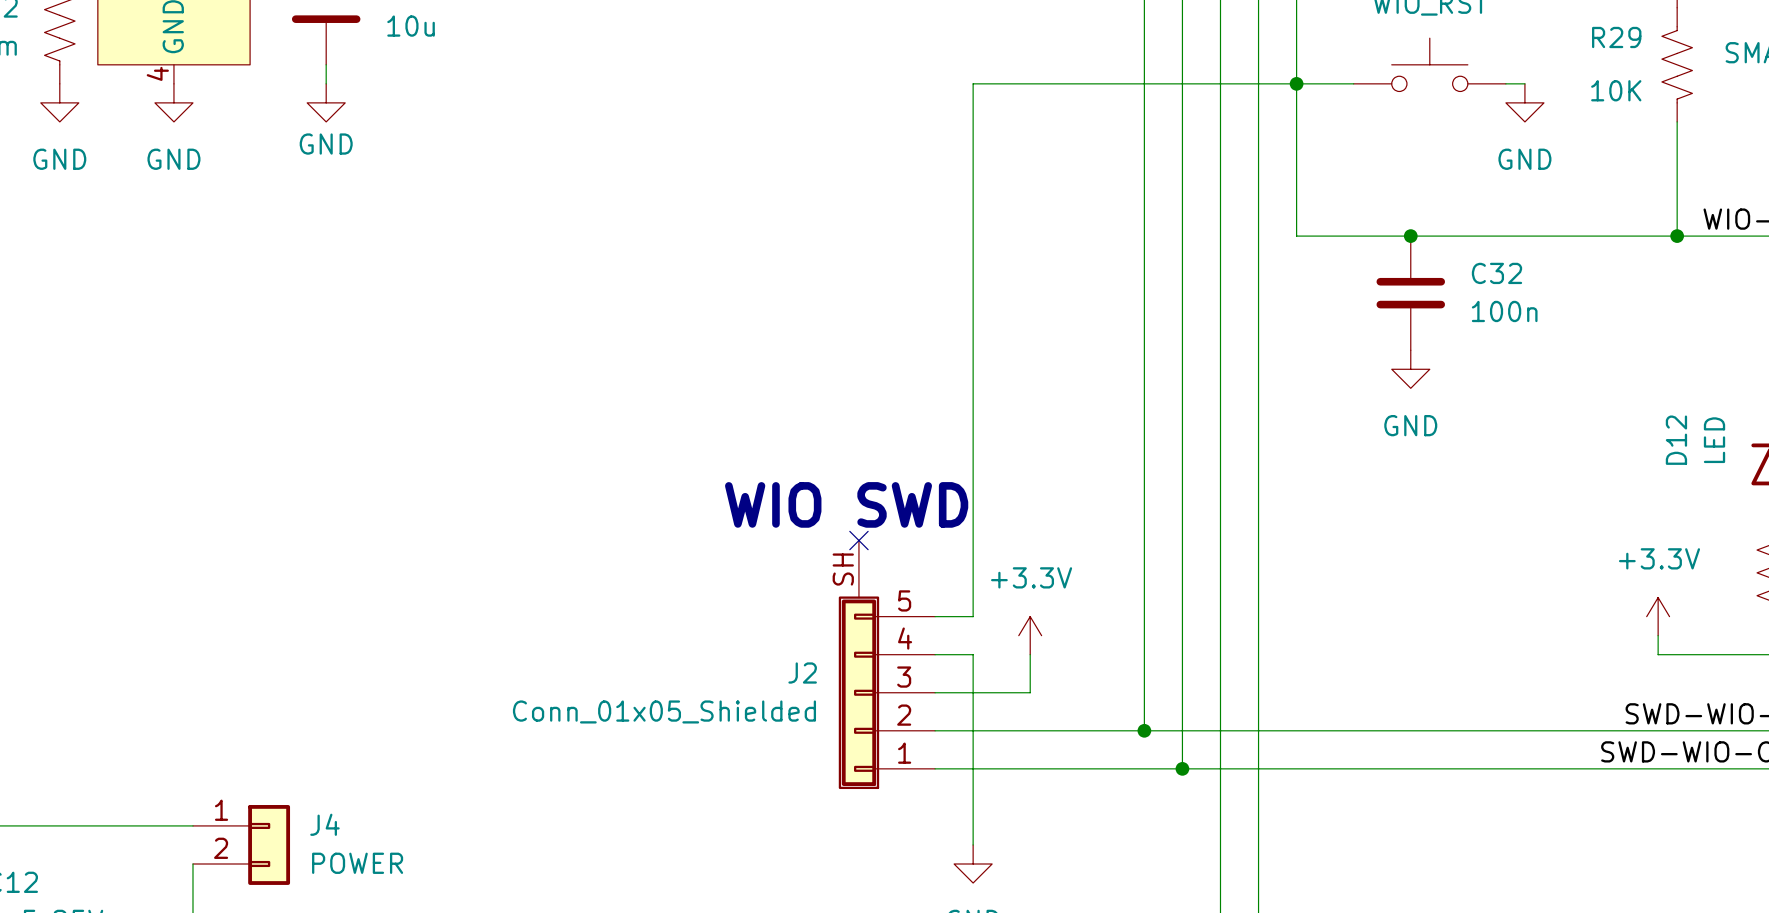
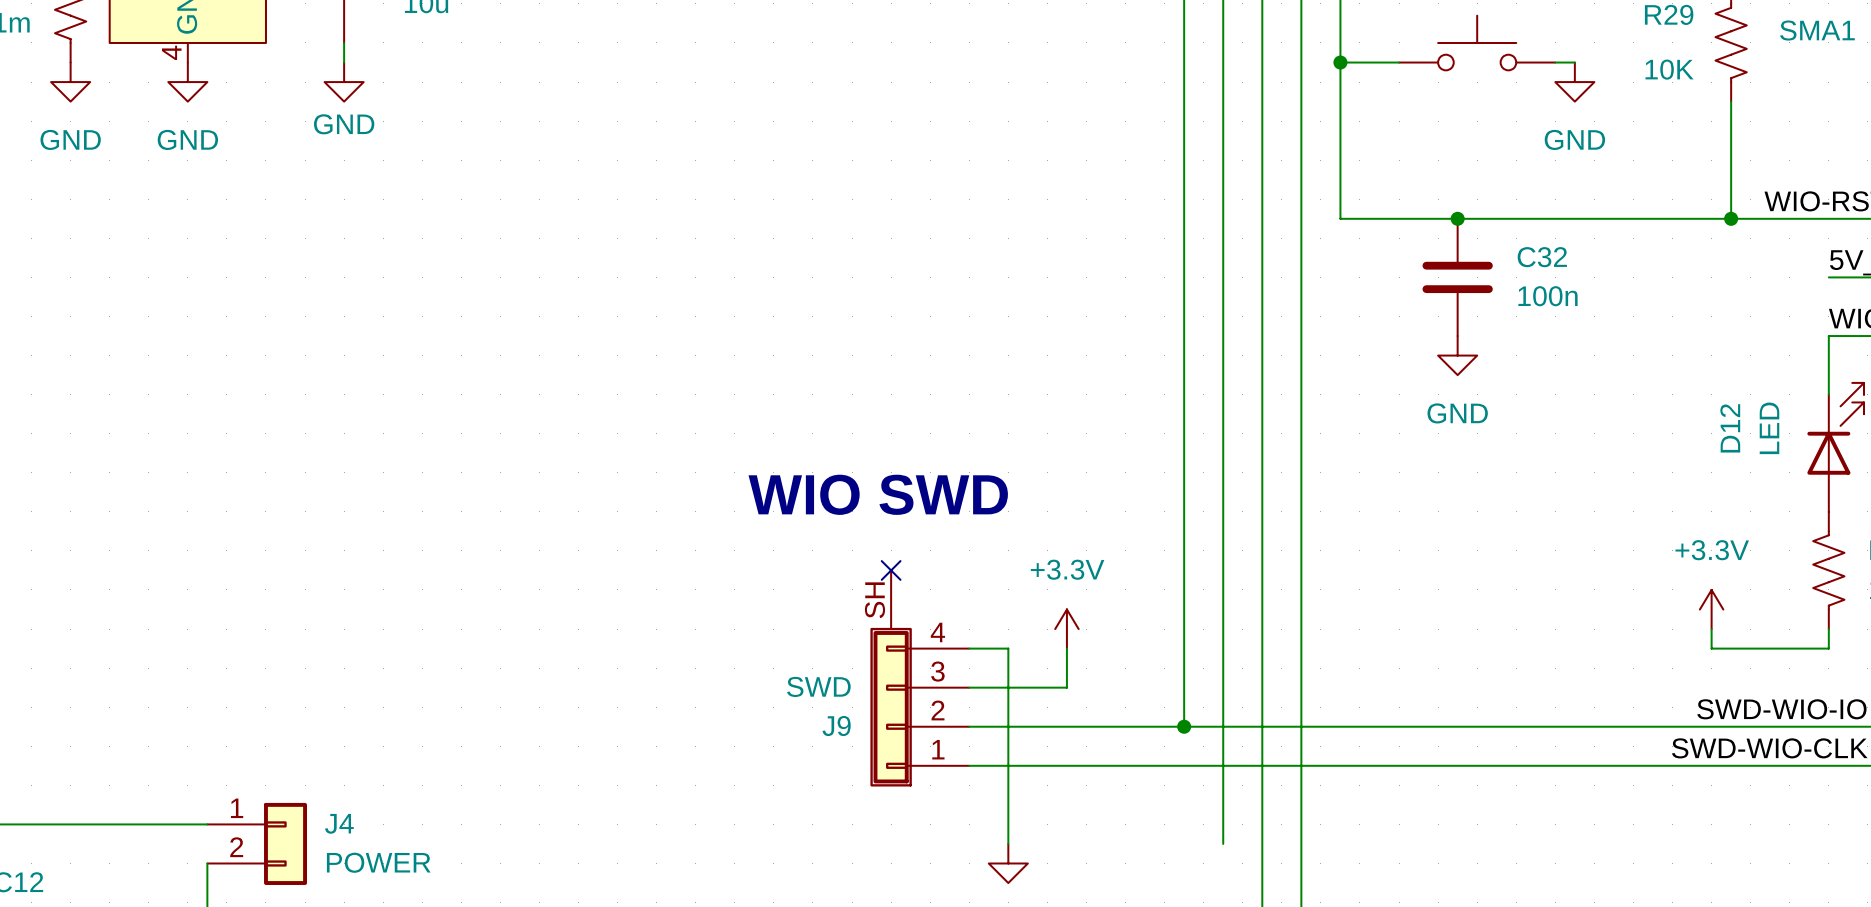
wire: (1296, 83) (973, 83) (973, 616) (935, 616) -> none
no-connect mark position: (858, 540) -> (891, 570)
J2: Conn_01x05_Shielded (886, 664) -> none
J9: none -> SWD (919, 678)
wire: none -> (1223, 765) (1223, 843)
junction: (1182, 768) -> none

